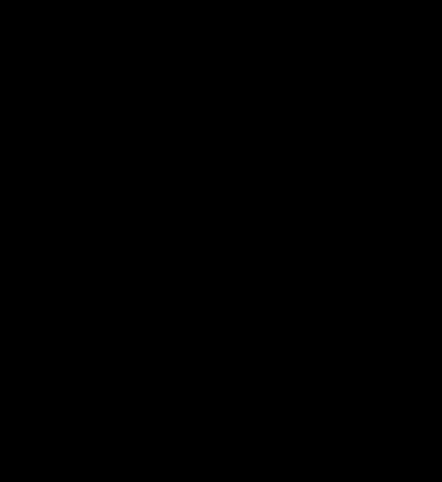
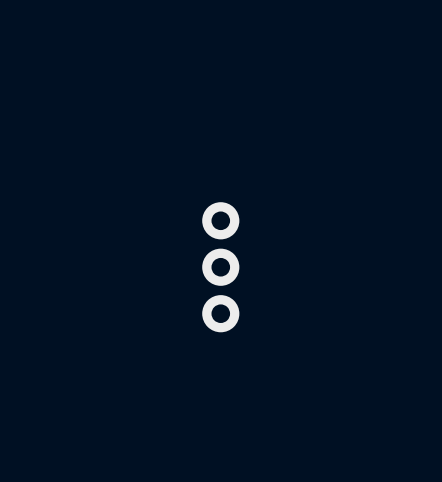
via: none -> (220, 220)
via: none -> (220, 267)
via: none -> (220, 313)

